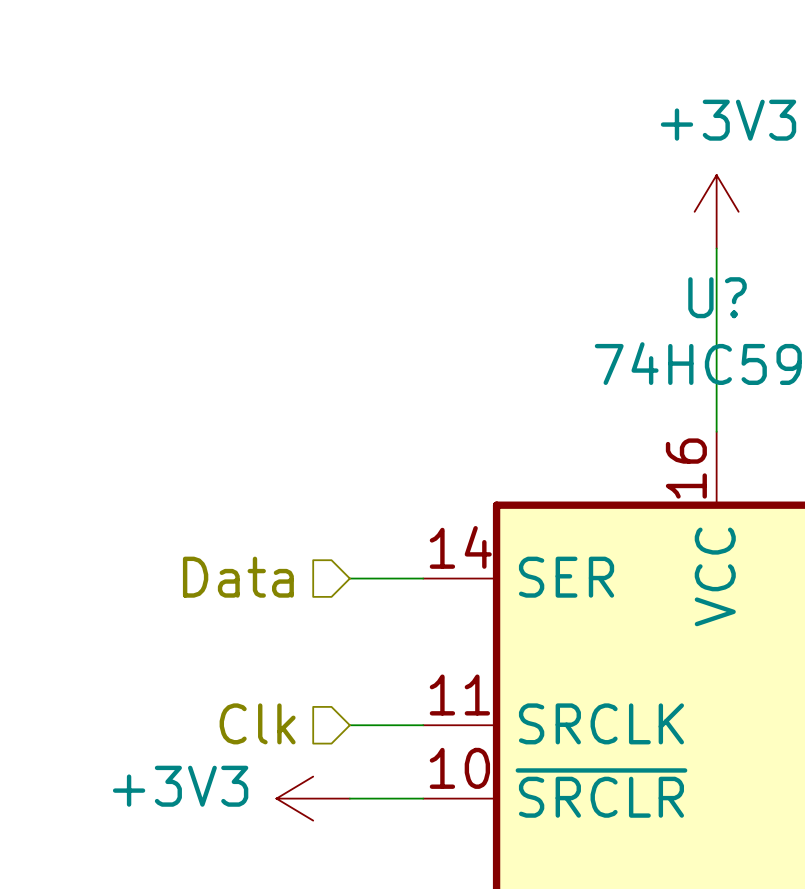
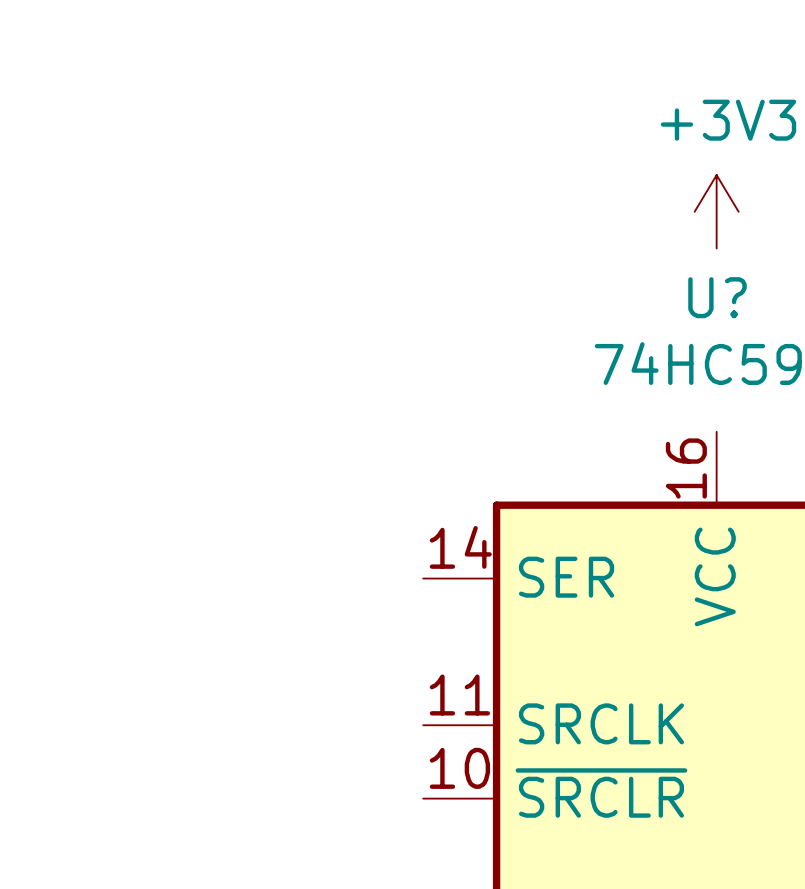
wire: (716, 248) (716, 431) -> none
hierarchical label: Data (238, 577) -> none
wire: (349, 578) (423, 578) -> none
hierarchical label: Clk (257, 723) -> none
wire: (349, 725) (423, 725) -> none
power symbol: +3V3 (313, 798) -> none
wire: (349, 798) (423, 798) -> none

